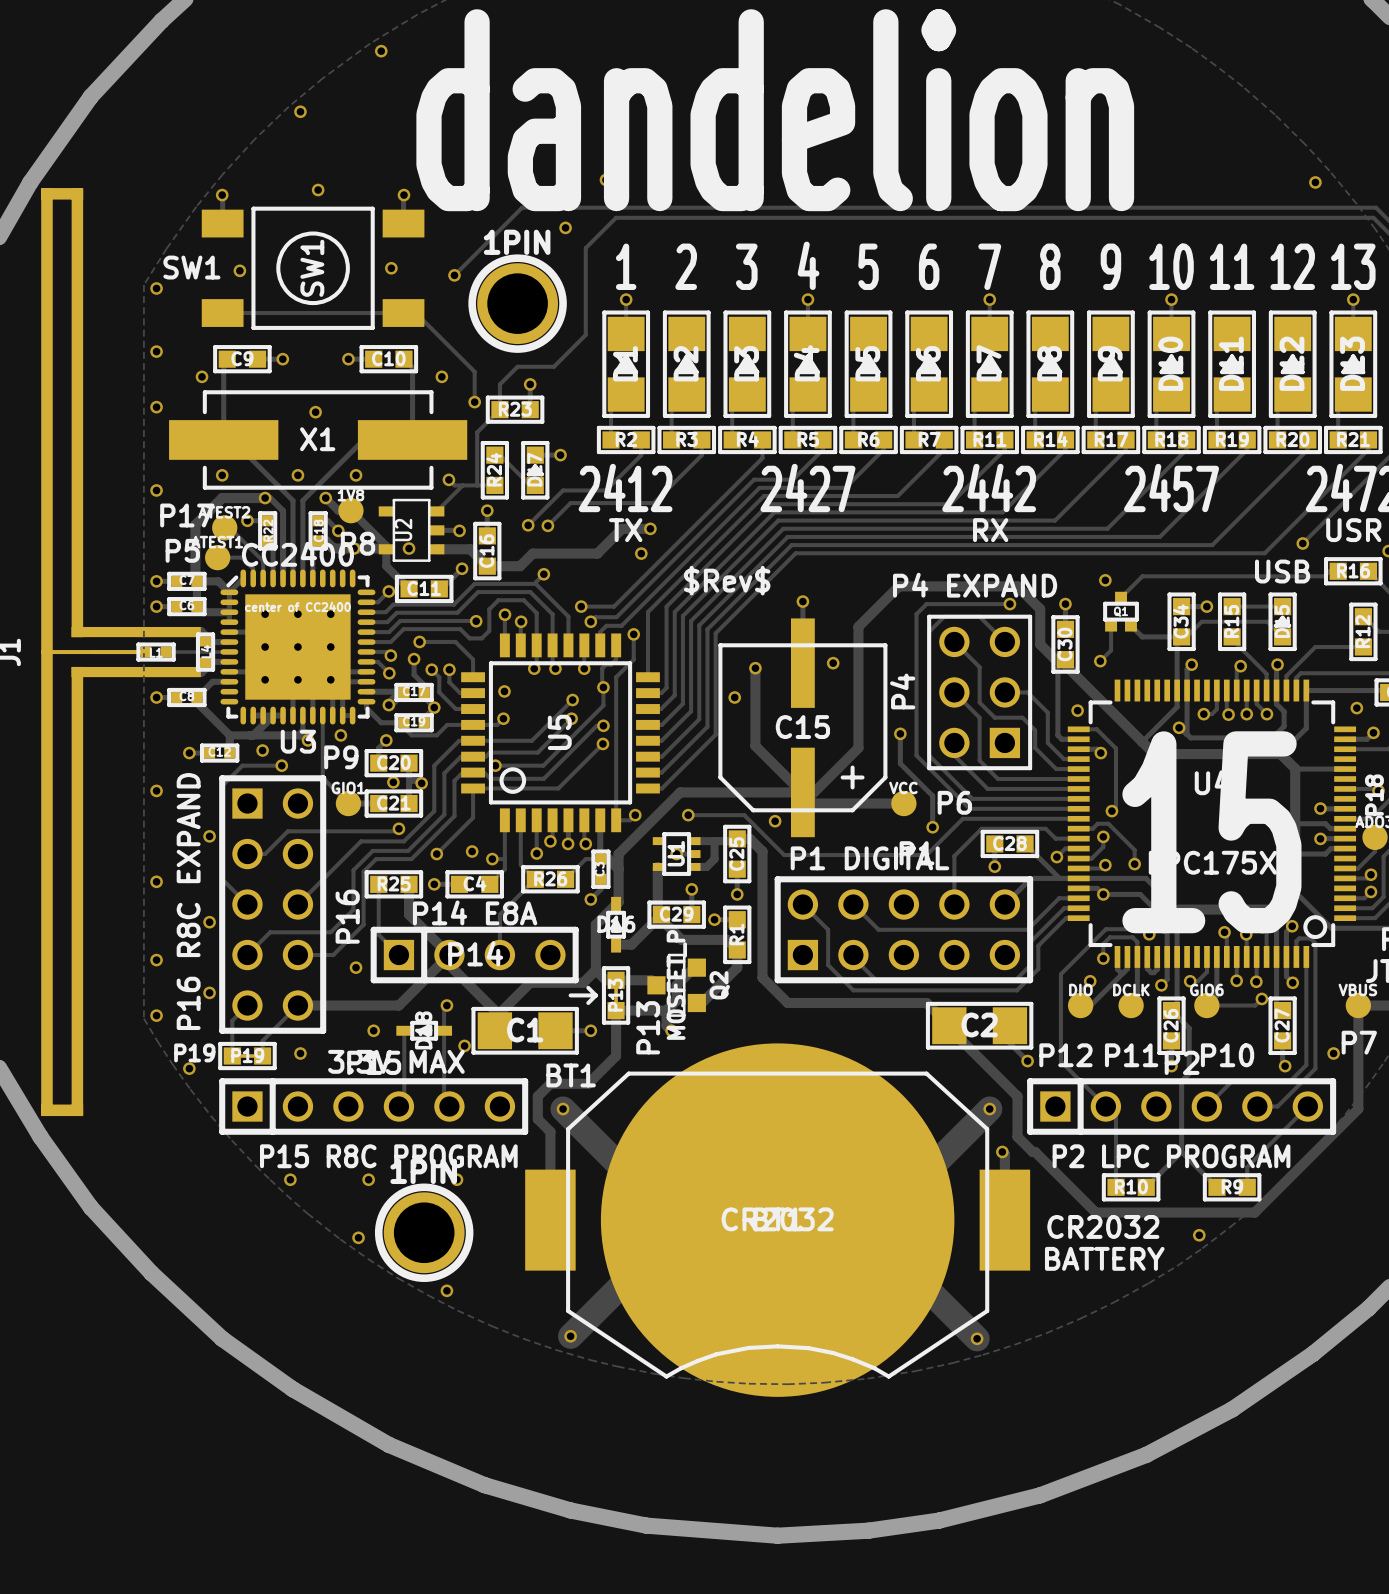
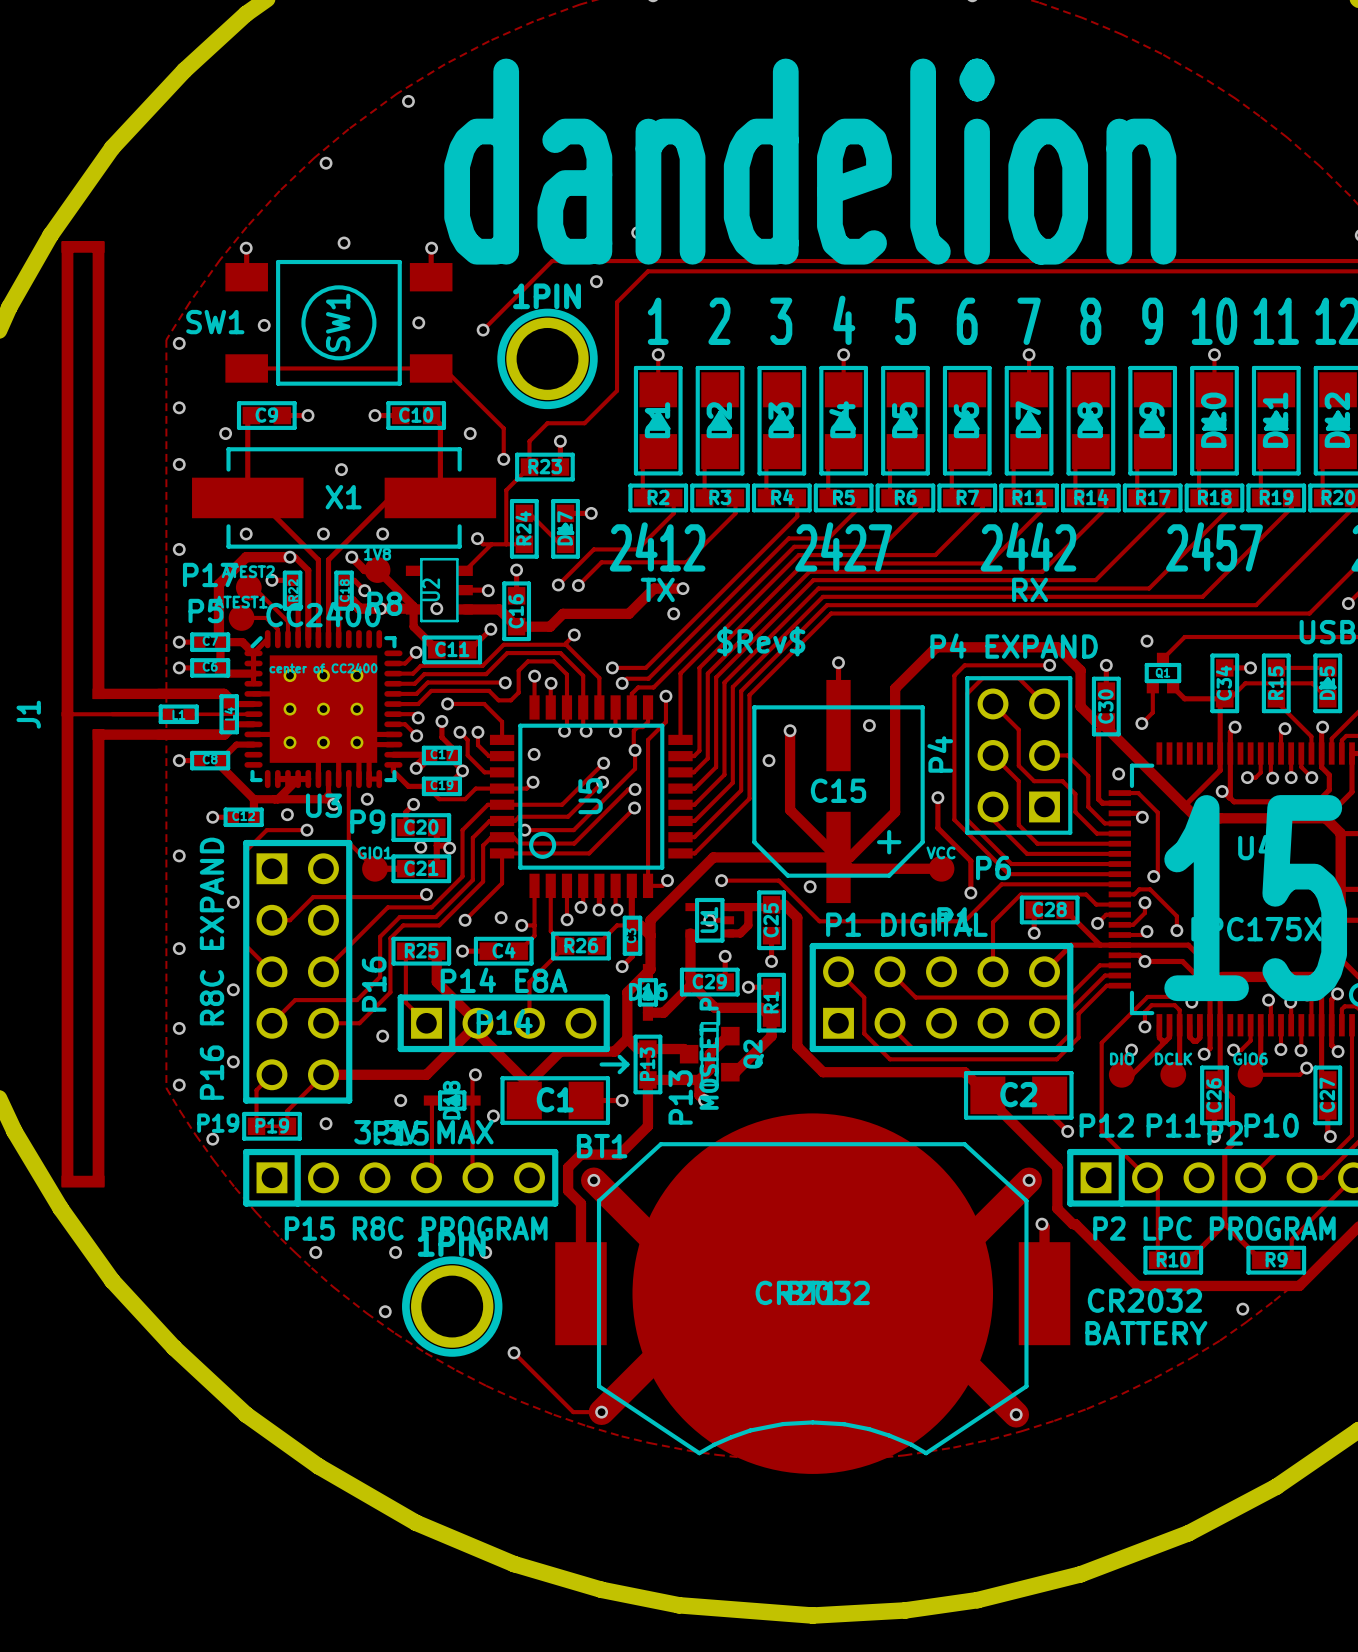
track: none -> (514, 1352) (573, 1412) (601, 1412)
via position: (446, 1290) -> (514, 1352)

